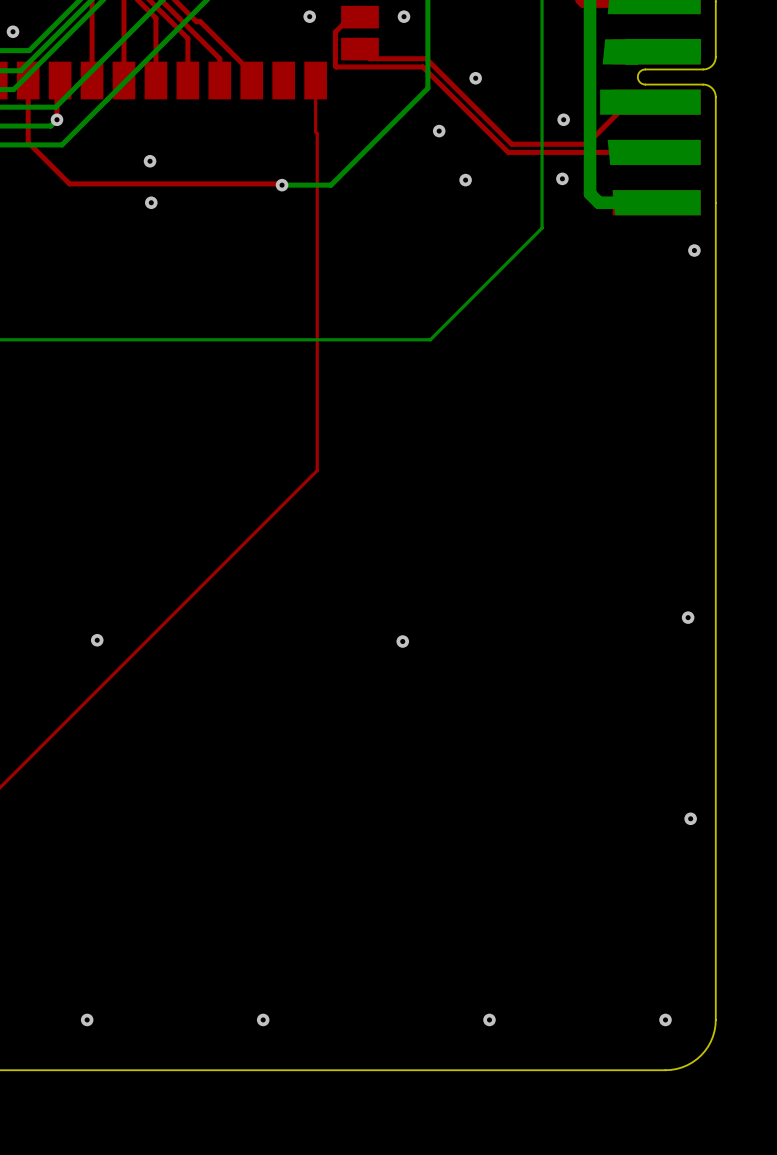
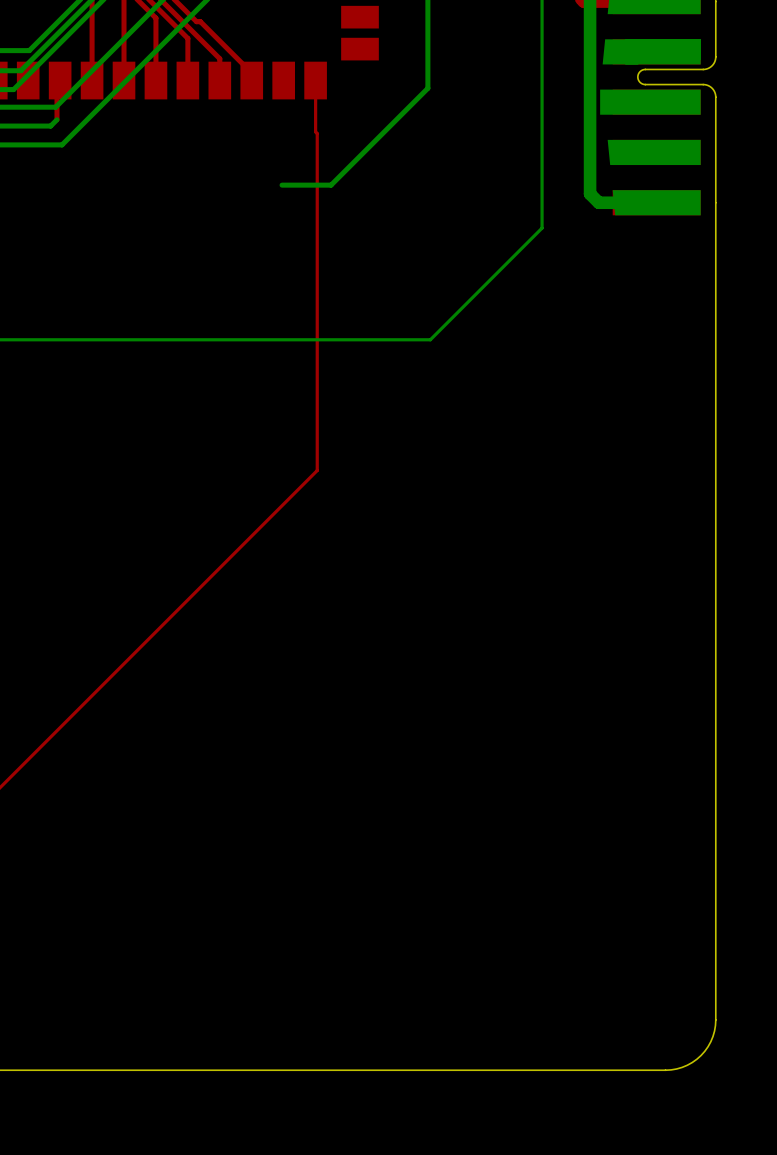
via: (309, 16) -> none
via: (404, 16) -> none
top track: (359, 17) (350, 17) (335, 32) (336, 66) (422, 66) (508, 152) (656, 152) -> none
via: (13, 31) -> none
top track: (359, 49) (369, 58) (426, 58) (511, 144) (586, 144) (629, 102) (656, 102) -> none
via: (475, 78) -> none
top track: (28, 80) (28, 142) (69, 183) (282, 185) -> none
via: (57, 119) -> none
via: (563, 119) -> none
via: (439, 131) -> none
via: (150, 161) -> none
via: (562, 178) -> none
via: (465, 180) -> none
via: (282, 185) -> none
via: (151, 202) -> none
via: (694, 250) -> none
via: (688, 617) -> none
via: (97, 640) -> none
via: (402, 641) -> none
via: (690, 818) -> none
via: (87, 1019) -> none
via: (263, 1019) -> none
via: (489, 1019) -> none
via: (665, 1019) -> none

